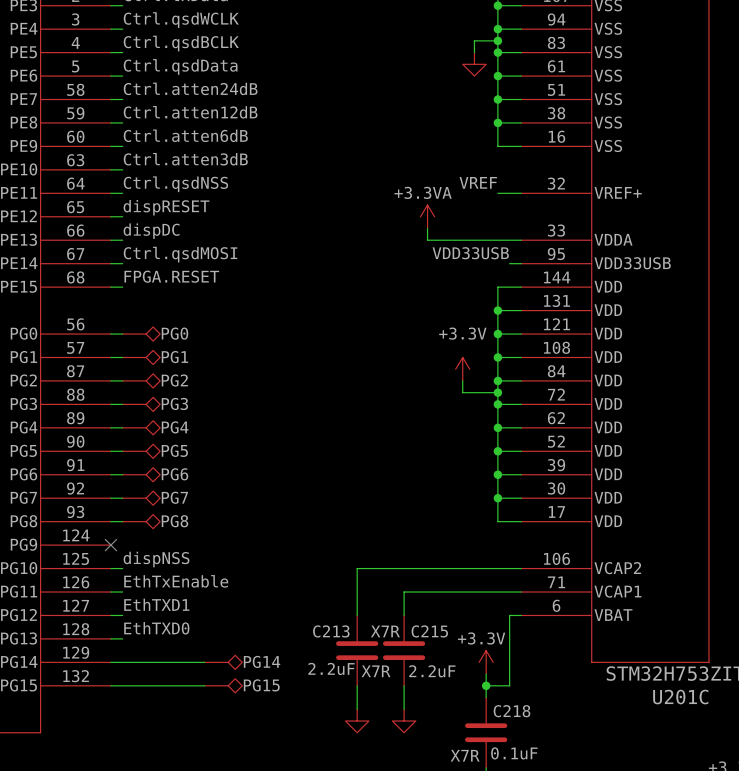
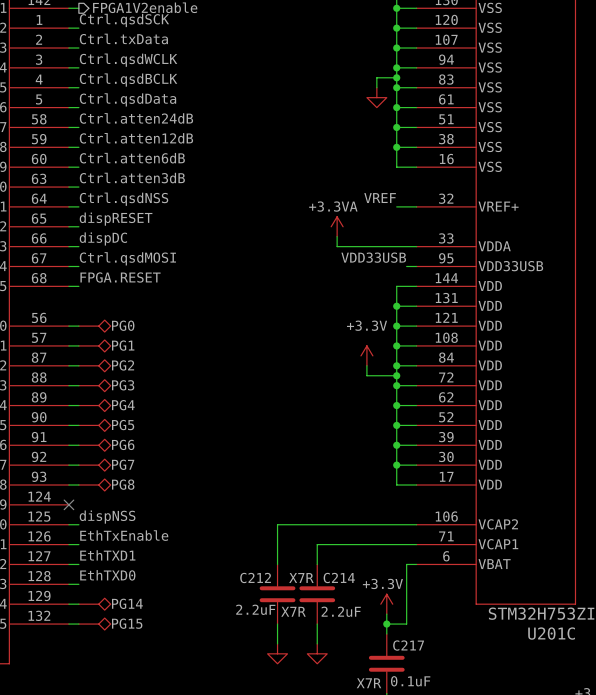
C213 name: C213 (331, 631) -> C212 (255, 578)
C215 name: C215 (429, 631) -> C214 (339, 578)
wire: (122, 662) (204, 662) -> none
part position: (223, 662) -> (94, 604)
wire: (122, 685) (204, 685) -> none
part position: (223, 685) -> (94, 624)
C218 name: C218 (512, 711) -> C217 (408, 645)

